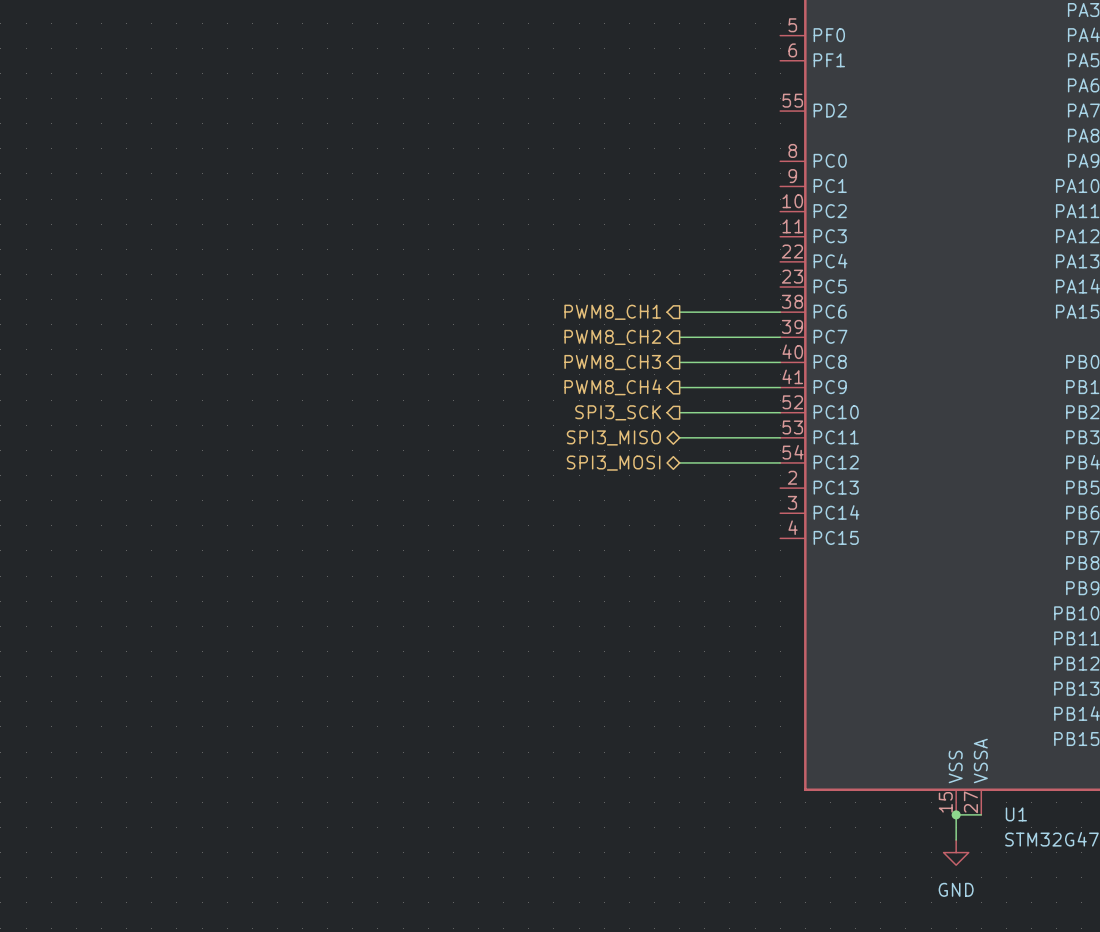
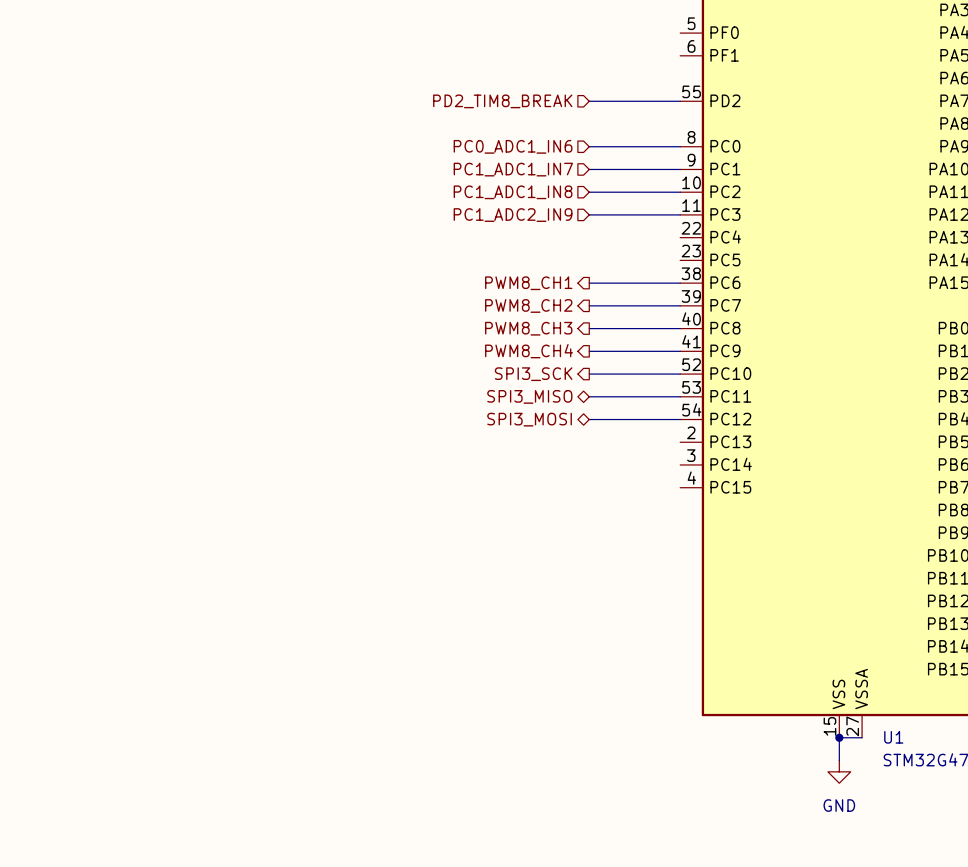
hierarchical label: none -> PD2_TIM8_BREAK (502, 101)
wire: none -> (589, 101) (680, 101)
hierarchical label: none -> PC0_ADC1_IN6 (513, 146)
wire: none -> (589, 146) (680, 146)
hierarchical label: none -> PC1_ADC1_IN7 (513, 169)
wire: none -> (589, 169) (680, 169)
hierarchical label: none -> PC1_ADC1_IN8 (513, 192)
wire: none -> (589, 192) (680, 192)
hierarchical label: none -> PC1_ADC2_IN9 (513, 215)
wire: none -> (589, 214) (680, 214)

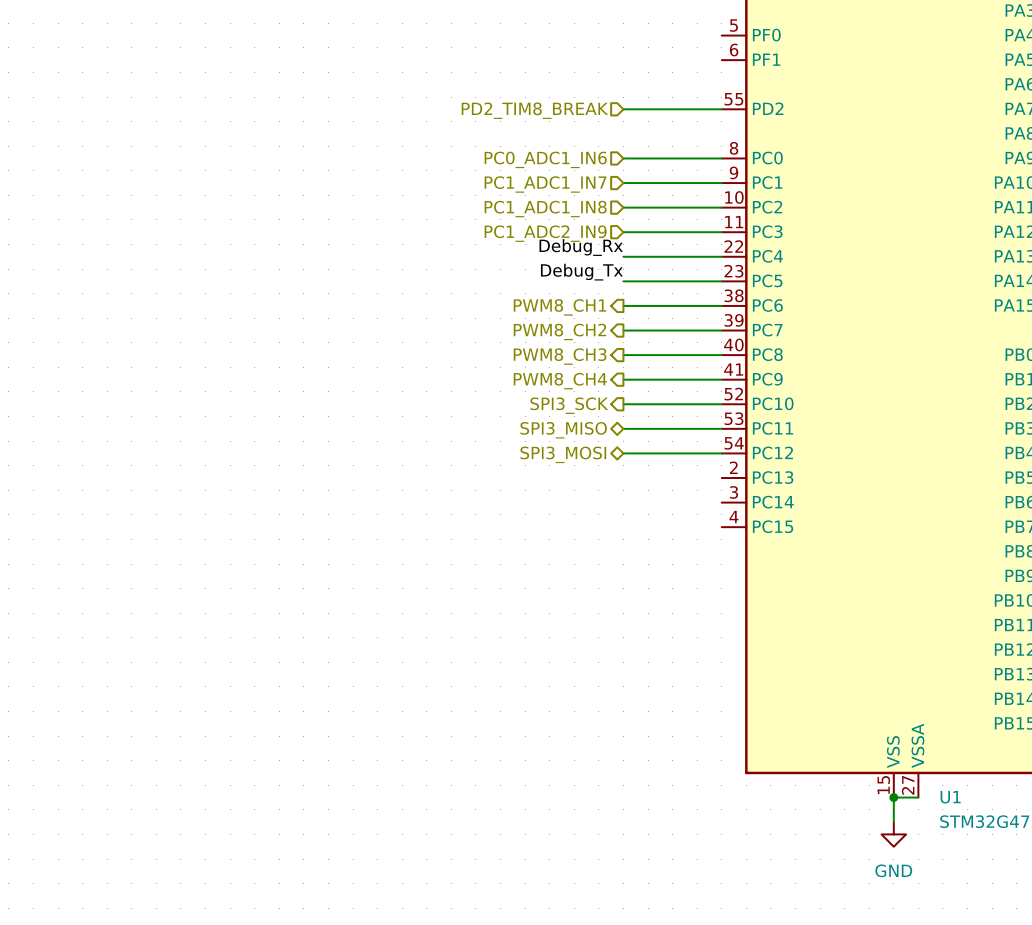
label: none -> Debug_Rx (581, 247)
wire: none -> (623, 256) (721, 256)
label: none -> Debug_Tx (581, 272)
wire: none -> (623, 281) (721, 281)

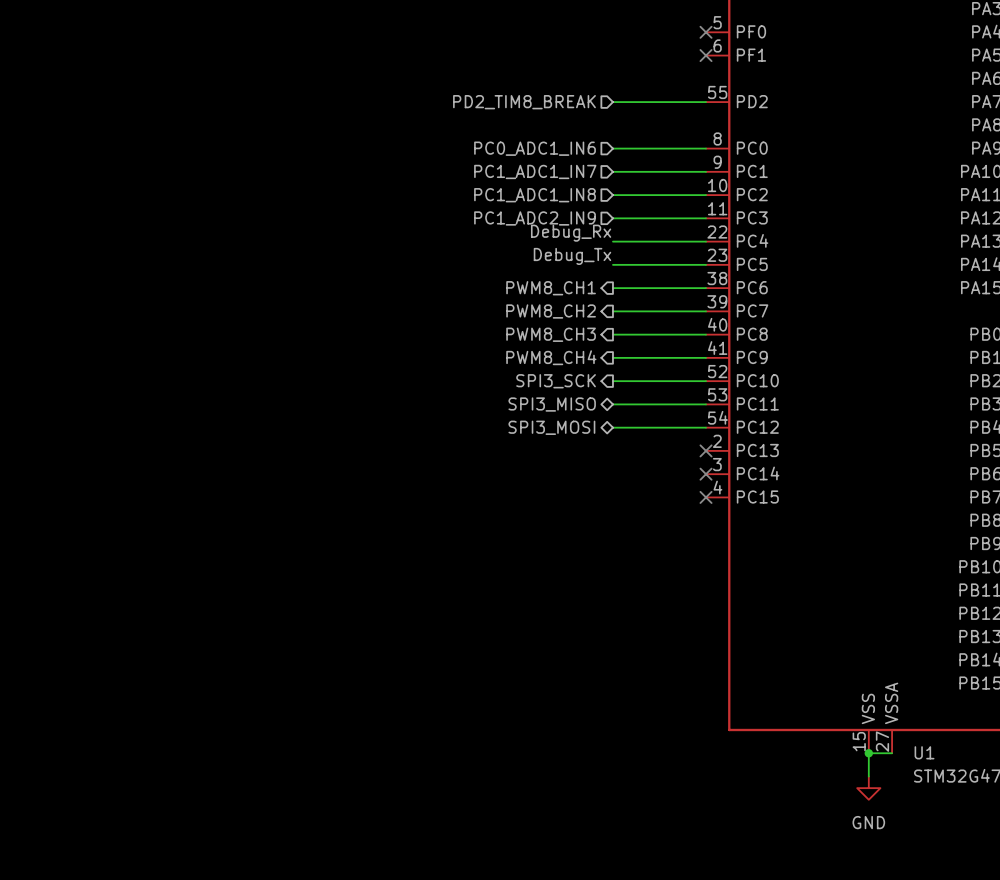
no-connect mark: none -> (706, 32)
no-connect mark: none -> (706, 55)
no-connect mark: none -> (706, 450)
no-connect mark: none -> (706, 474)
no-connect mark: none -> (706, 497)

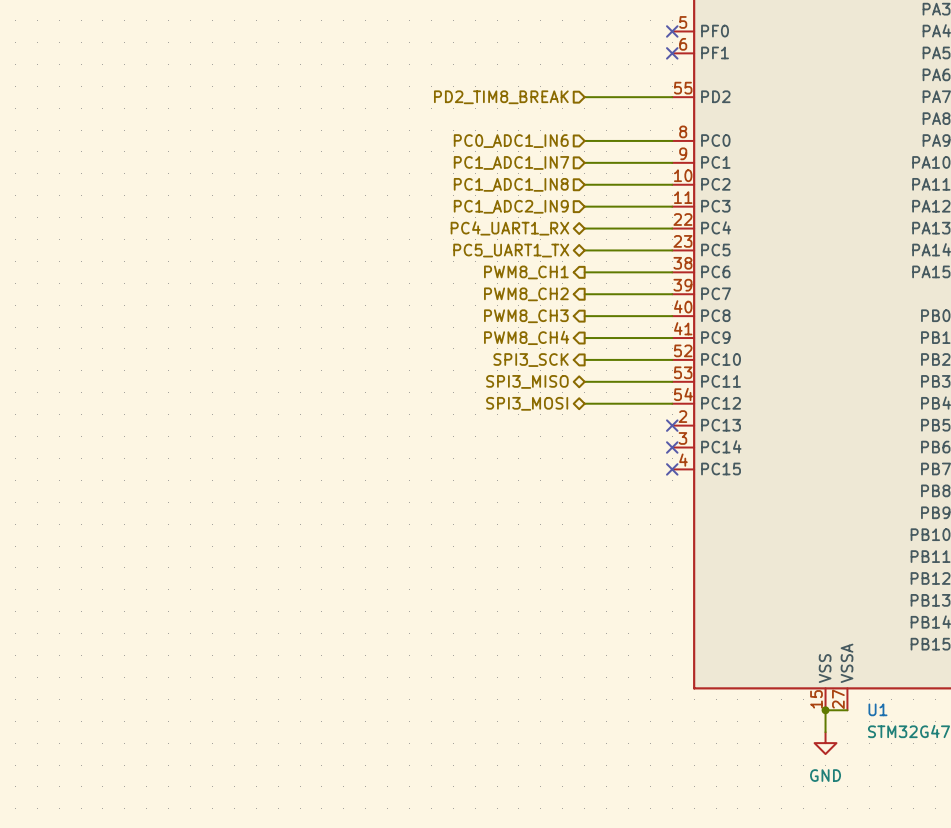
label: Debug_Rx (571, 233) -> none
hierarchical label: none -> PC4_UART1_RX (509, 228)
label: Debug_Tx (572, 256) -> none
hierarchical label: none -> PC5_UART1_TX (511, 250)

